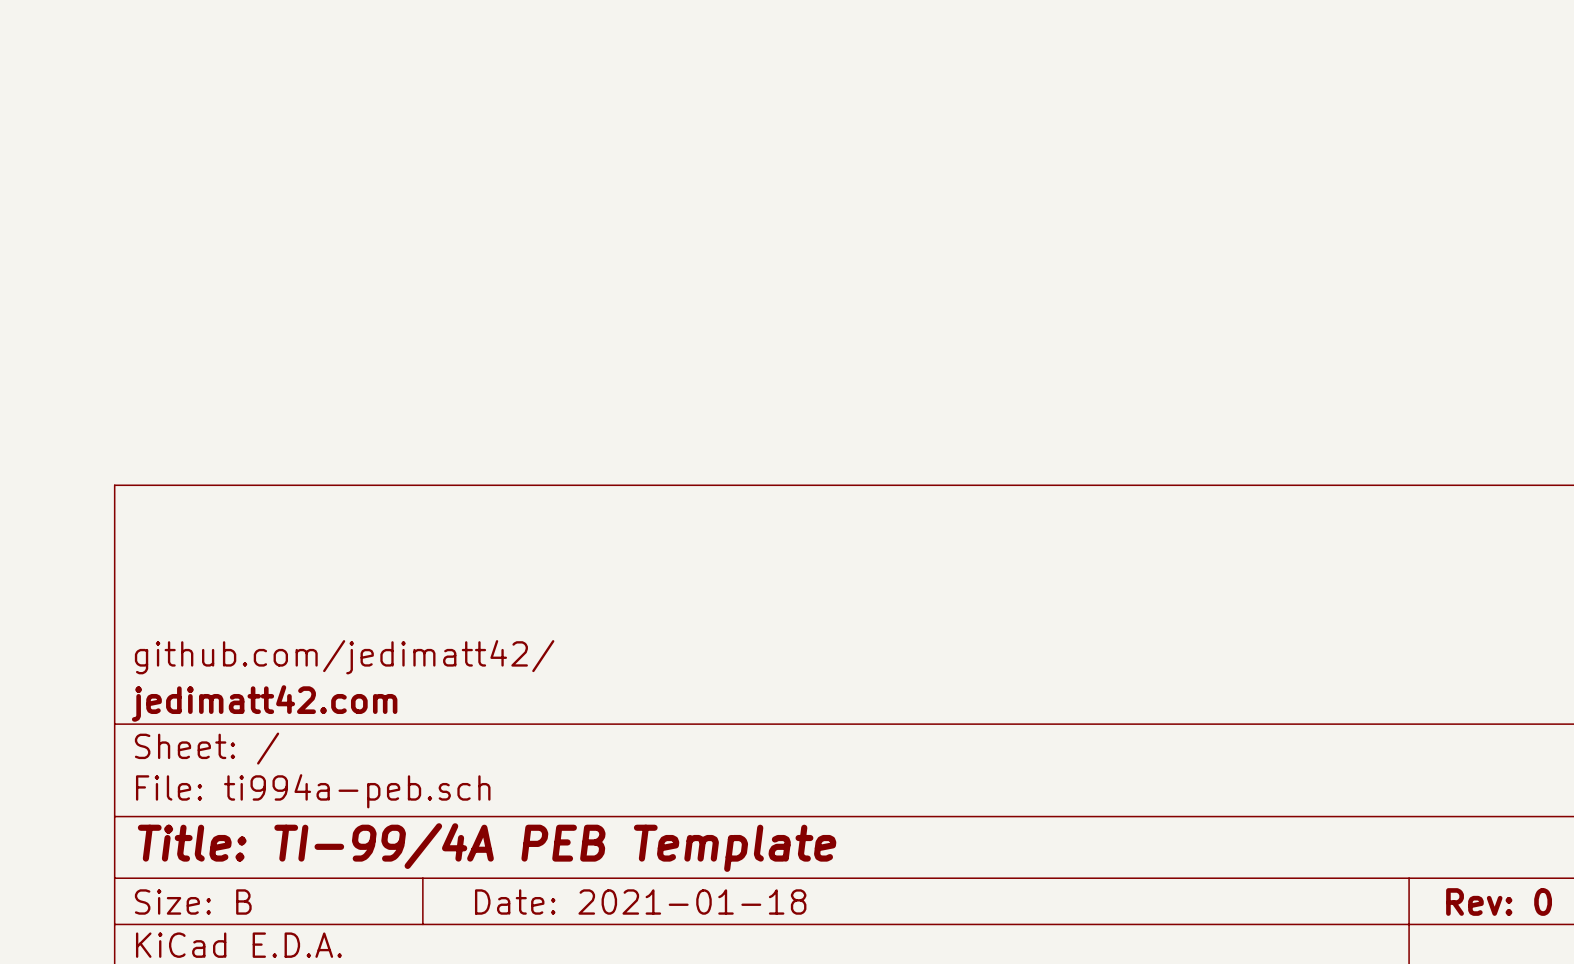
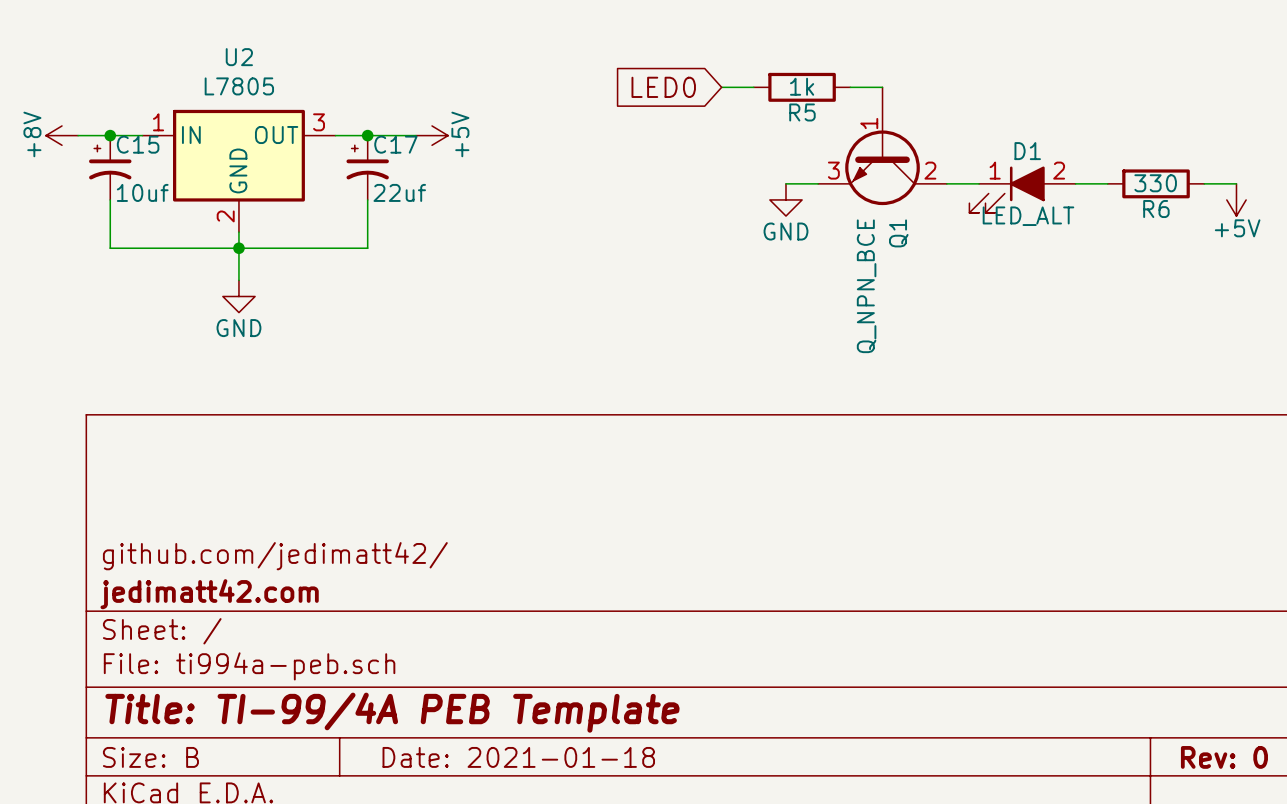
global label: none -> LED0 (663, 87)
wire: none -> (721, 87) (753, 87)
R5: none -> 1k (802, 87)
wire: none -> (850, 87) (882, 87)
power symbol: none -> +8V (61, 135)
wire: none -> (78, 135) (142, 135)
junction: none -> (110, 135)
wire: none -> (335, 135) (415, 135)
junction: none -> (367, 135)
power symbol: none -> +5V (432, 135)
Q1: none -> Q_NPN_BCE (882, 146)
C15: none -> 10uf (110, 167)
C17: none -> 22uf (367, 167)
U2: none -> L7805 (238, 171)
wire: none -> (785, 183) (818, 183)
wire: none -> (946, 183) (979, 183)
wire: none -> (1075, 183) (1107, 183)
R6: none -> 330 (1156, 183)
wire: none -> (1204, 183) (1236, 183)
D1: none -> LED_ALT (1022, 189)
wire: none -> (110, 199) (110, 248) (367, 248) (367, 199)
power symbol: none -> GND (785, 199)
power symbol: none -> +5V (1236, 199)
wire: none -> (238, 232) (238, 280)
junction: none -> (238, 248)
power symbol: none -> GND (238, 296)

